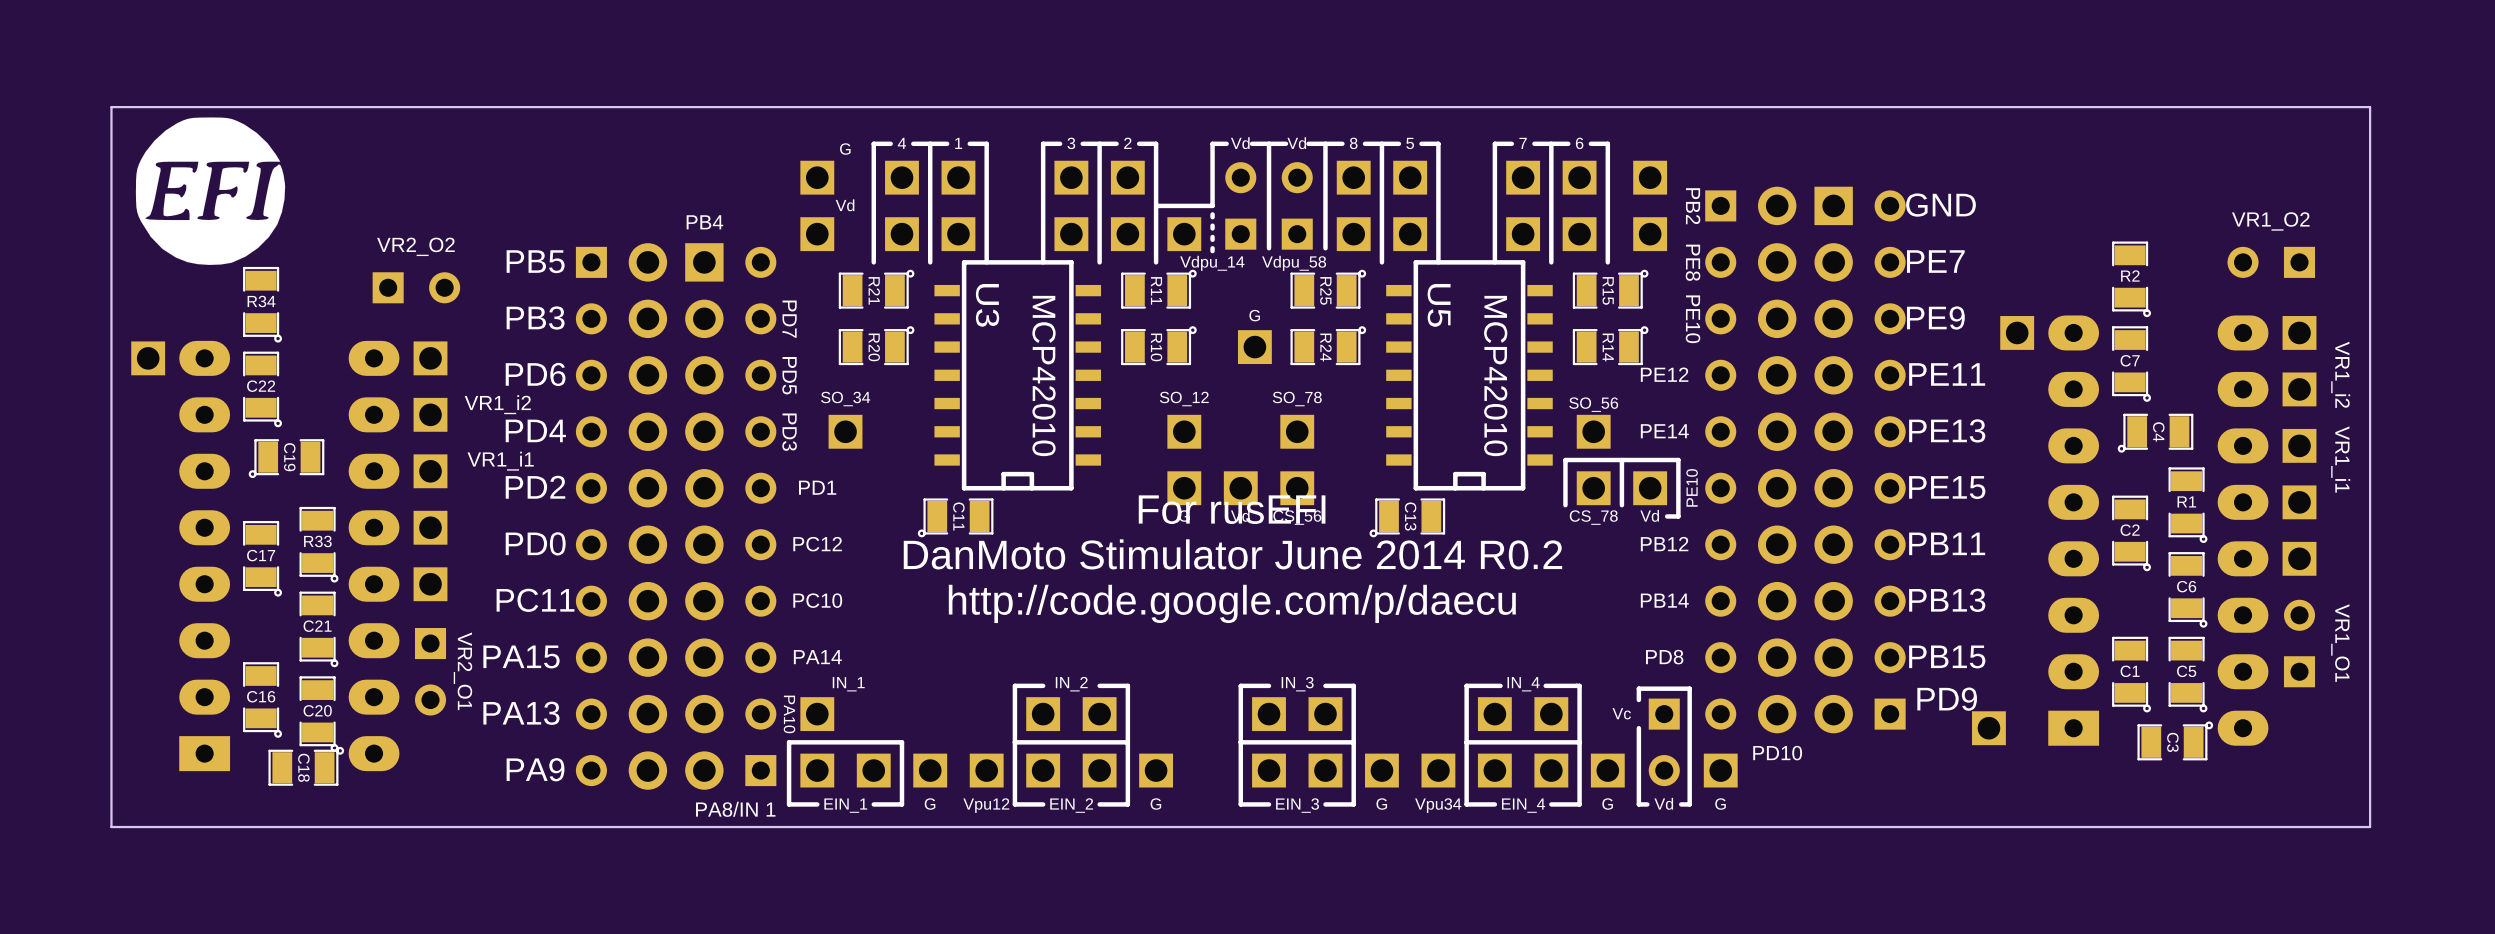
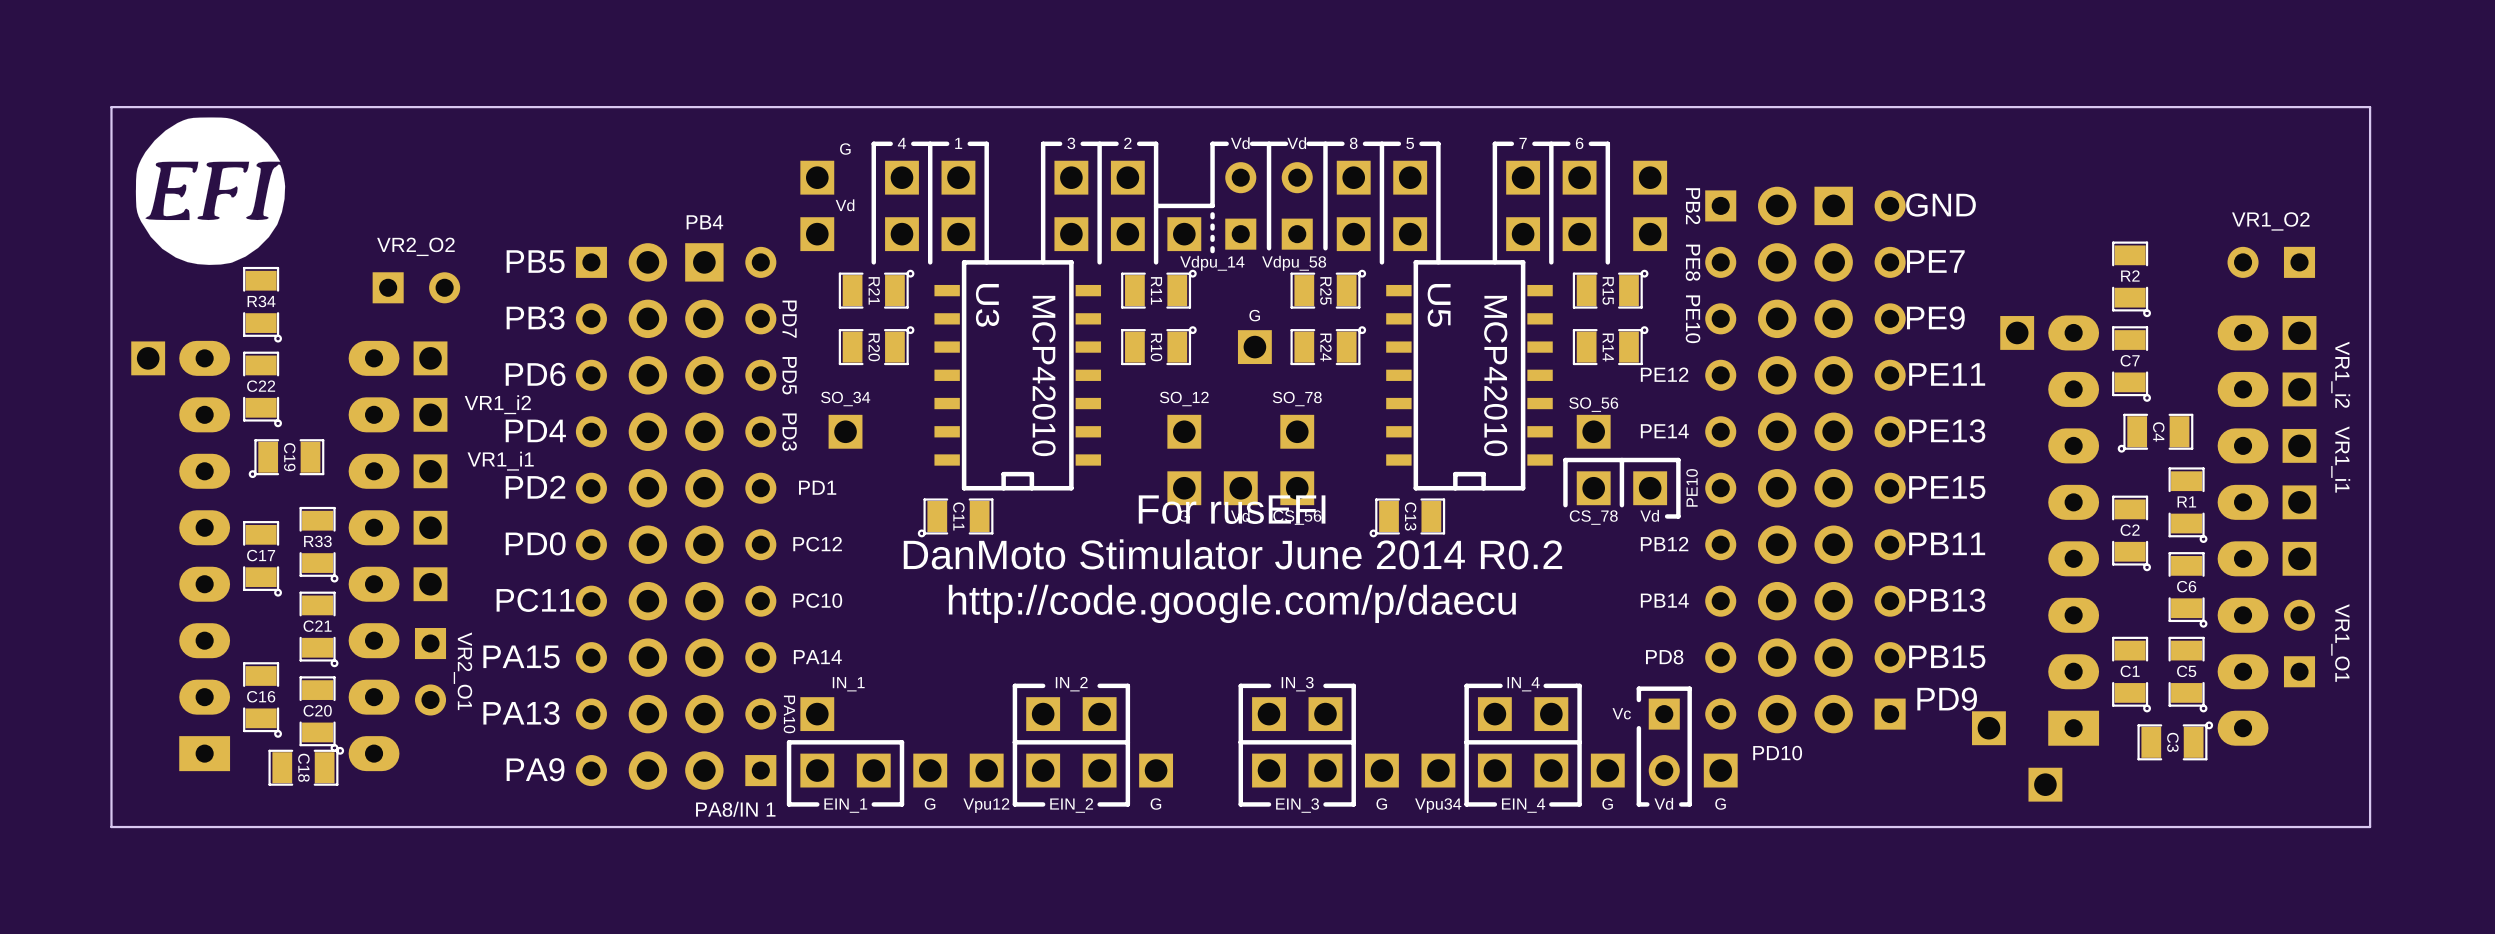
part: none -> (2045, 784)

